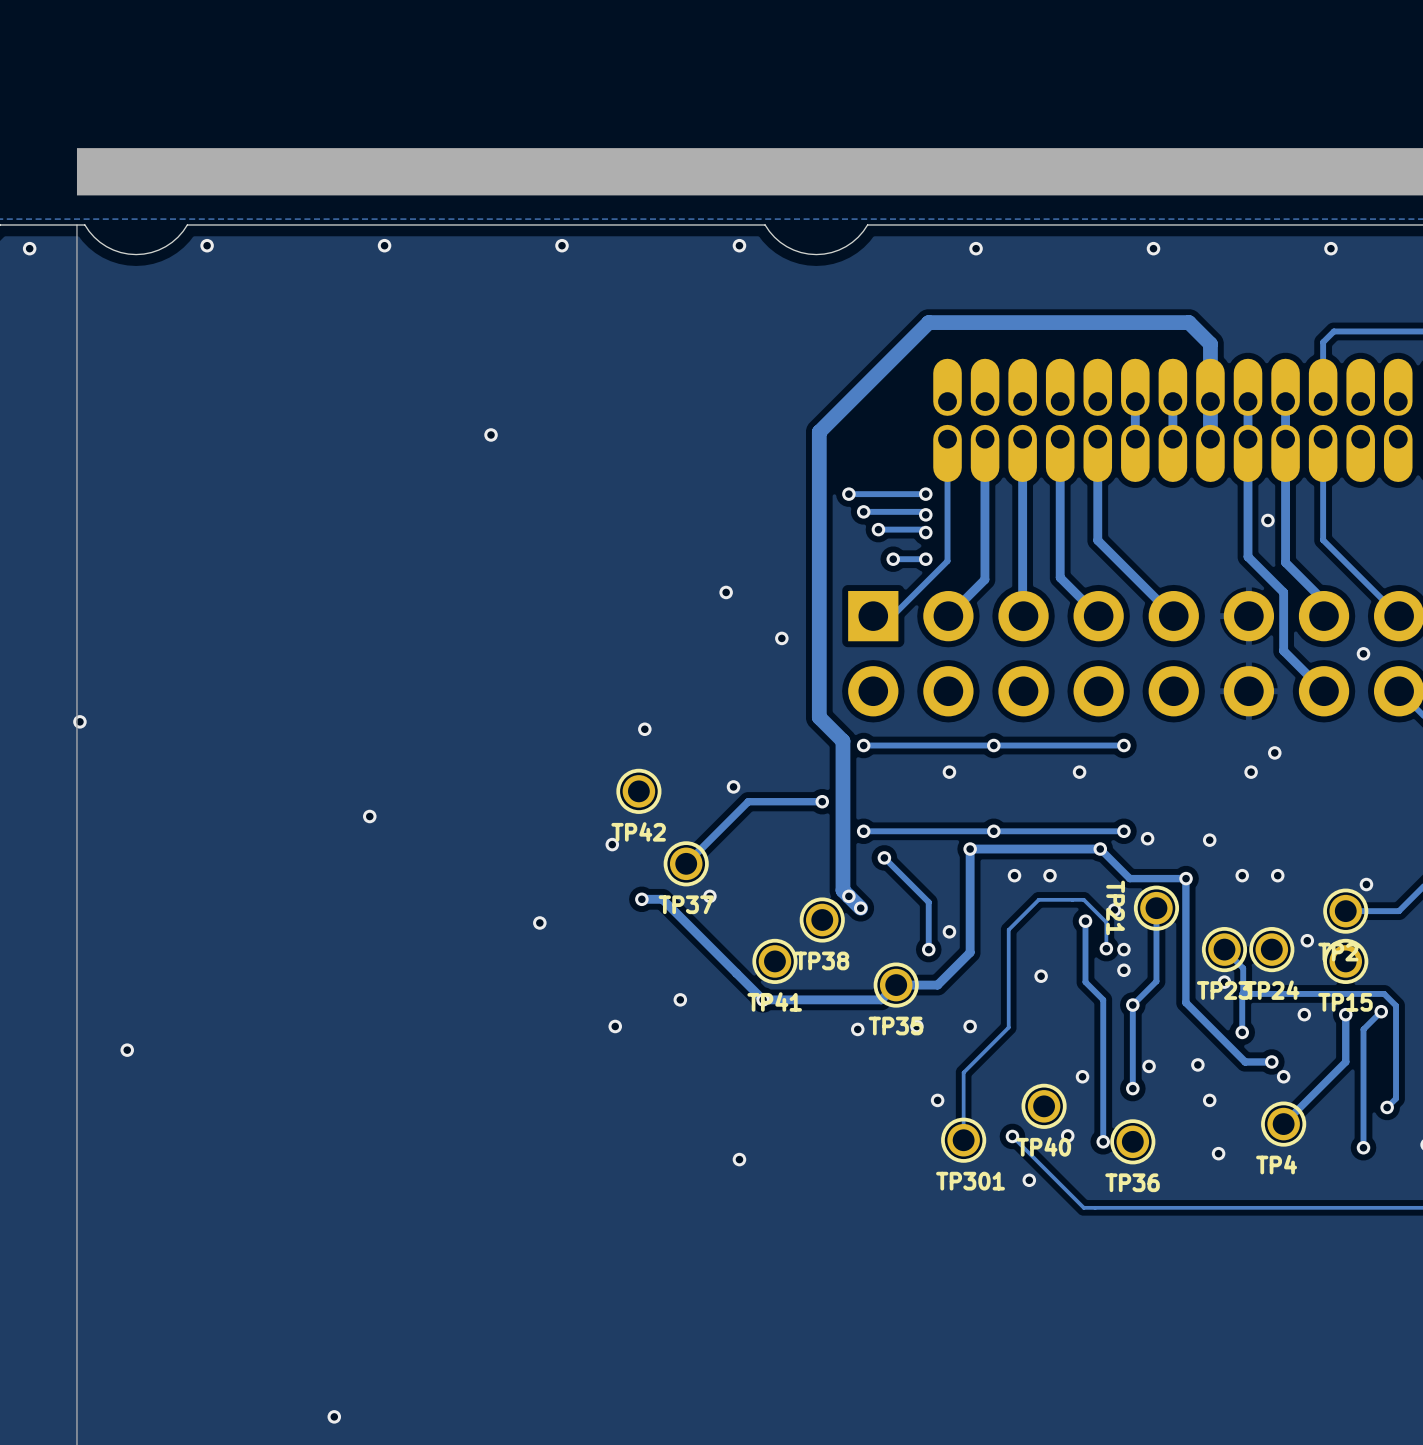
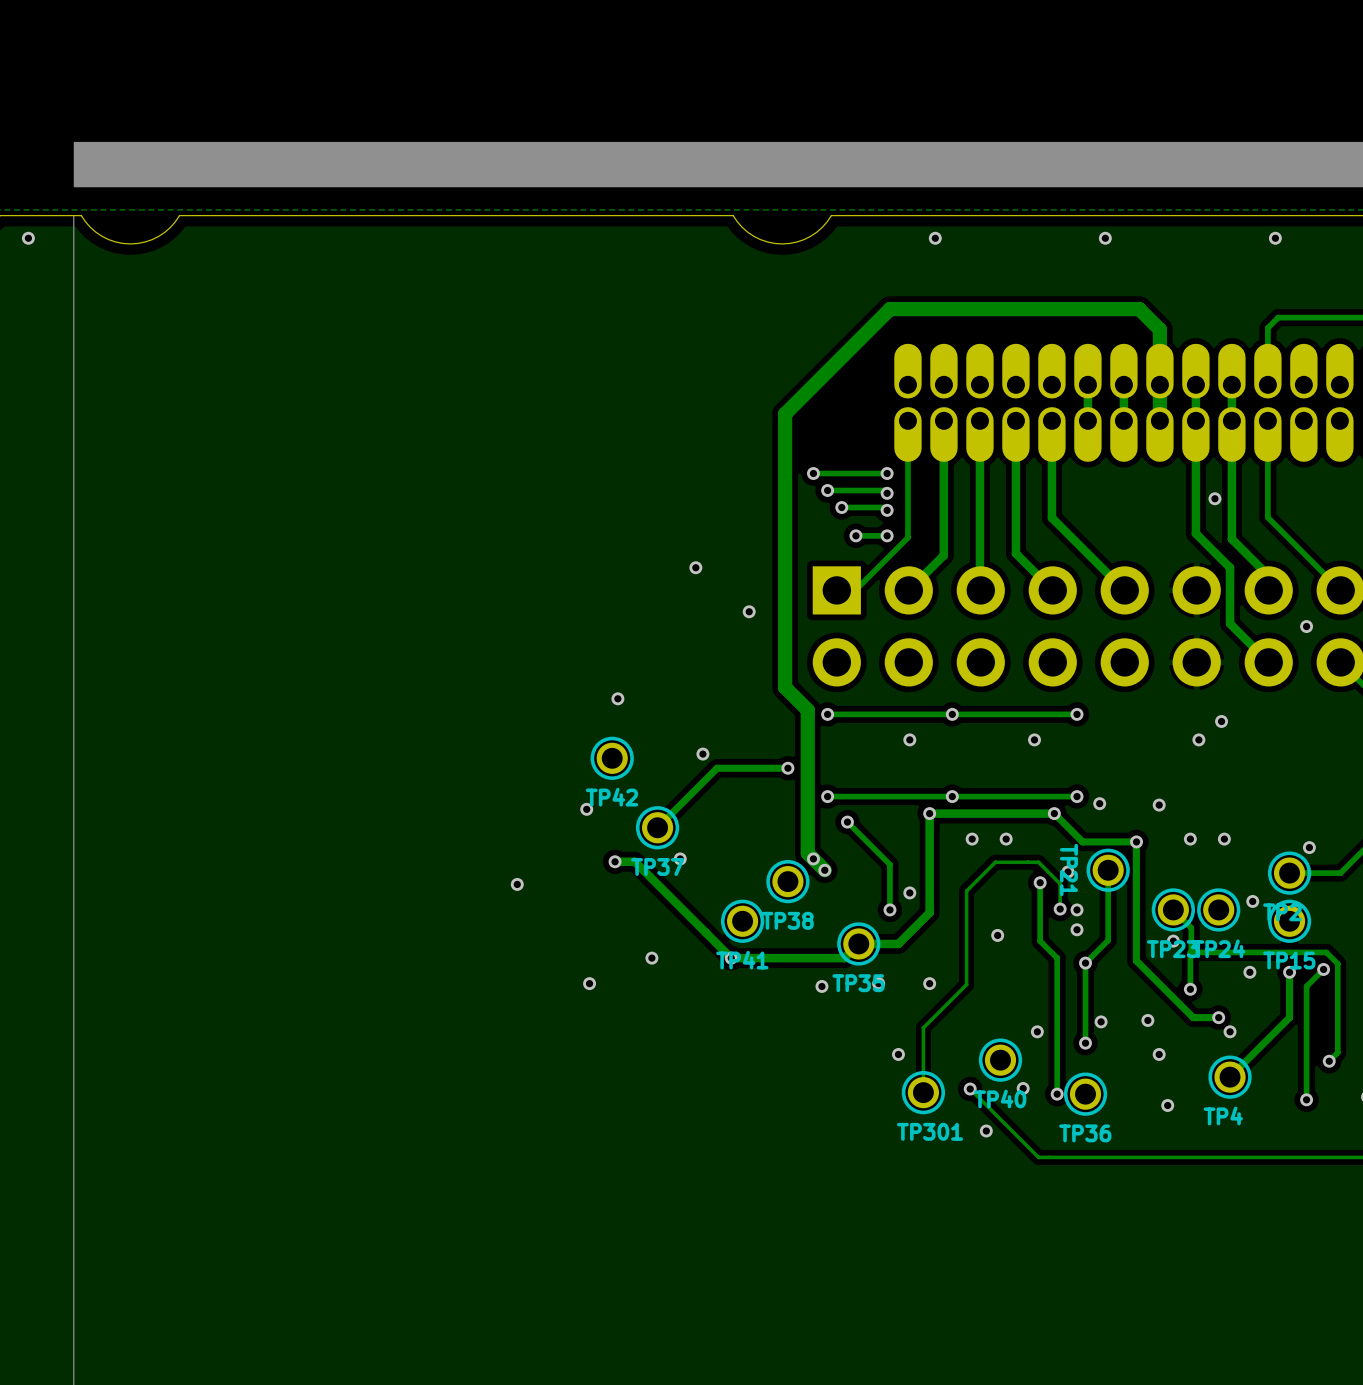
via: (207, 245) -> none
via: (384, 245) -> none
via: (562, 245) -> none
via: (739, 245) -> none
via: (491, 434) -> none
via: (79, 721) -> none
via: (369, 816) -> none
via: (127, 1050) -> none
via: (739, 1159) -> none
via: (334, 1416) -> none

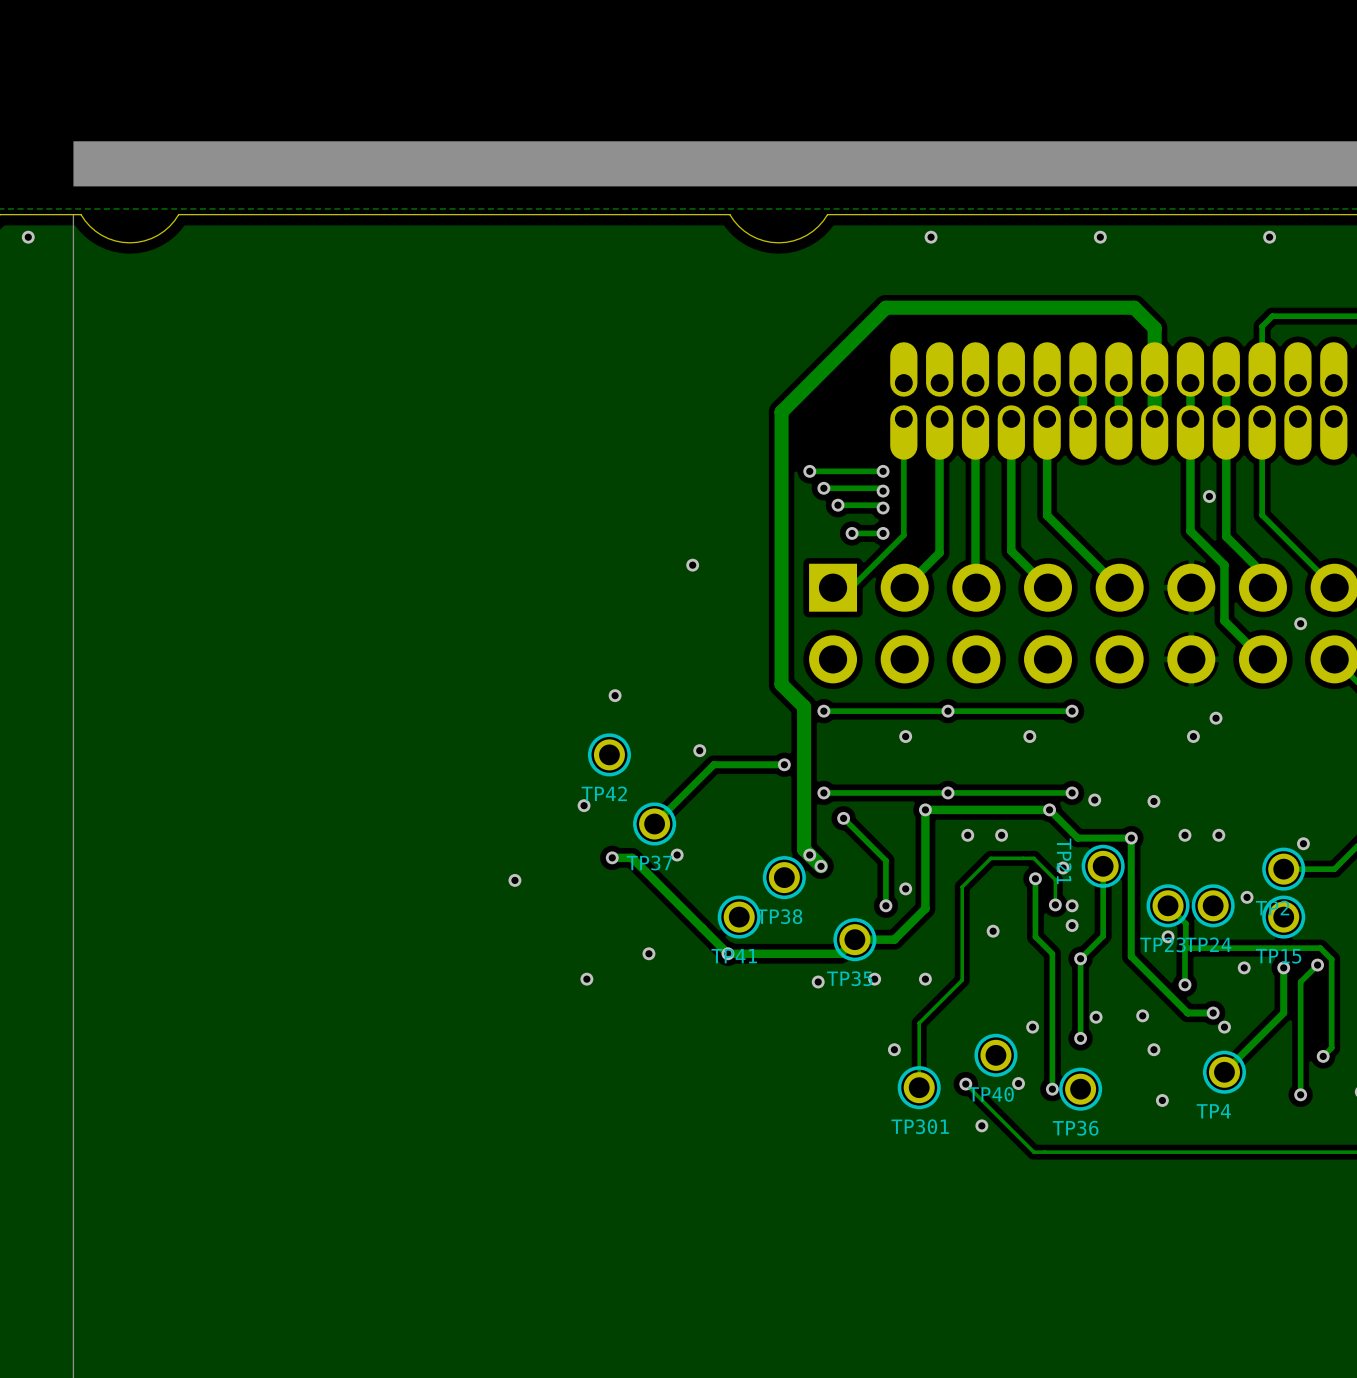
via: (749, 611) -> none

